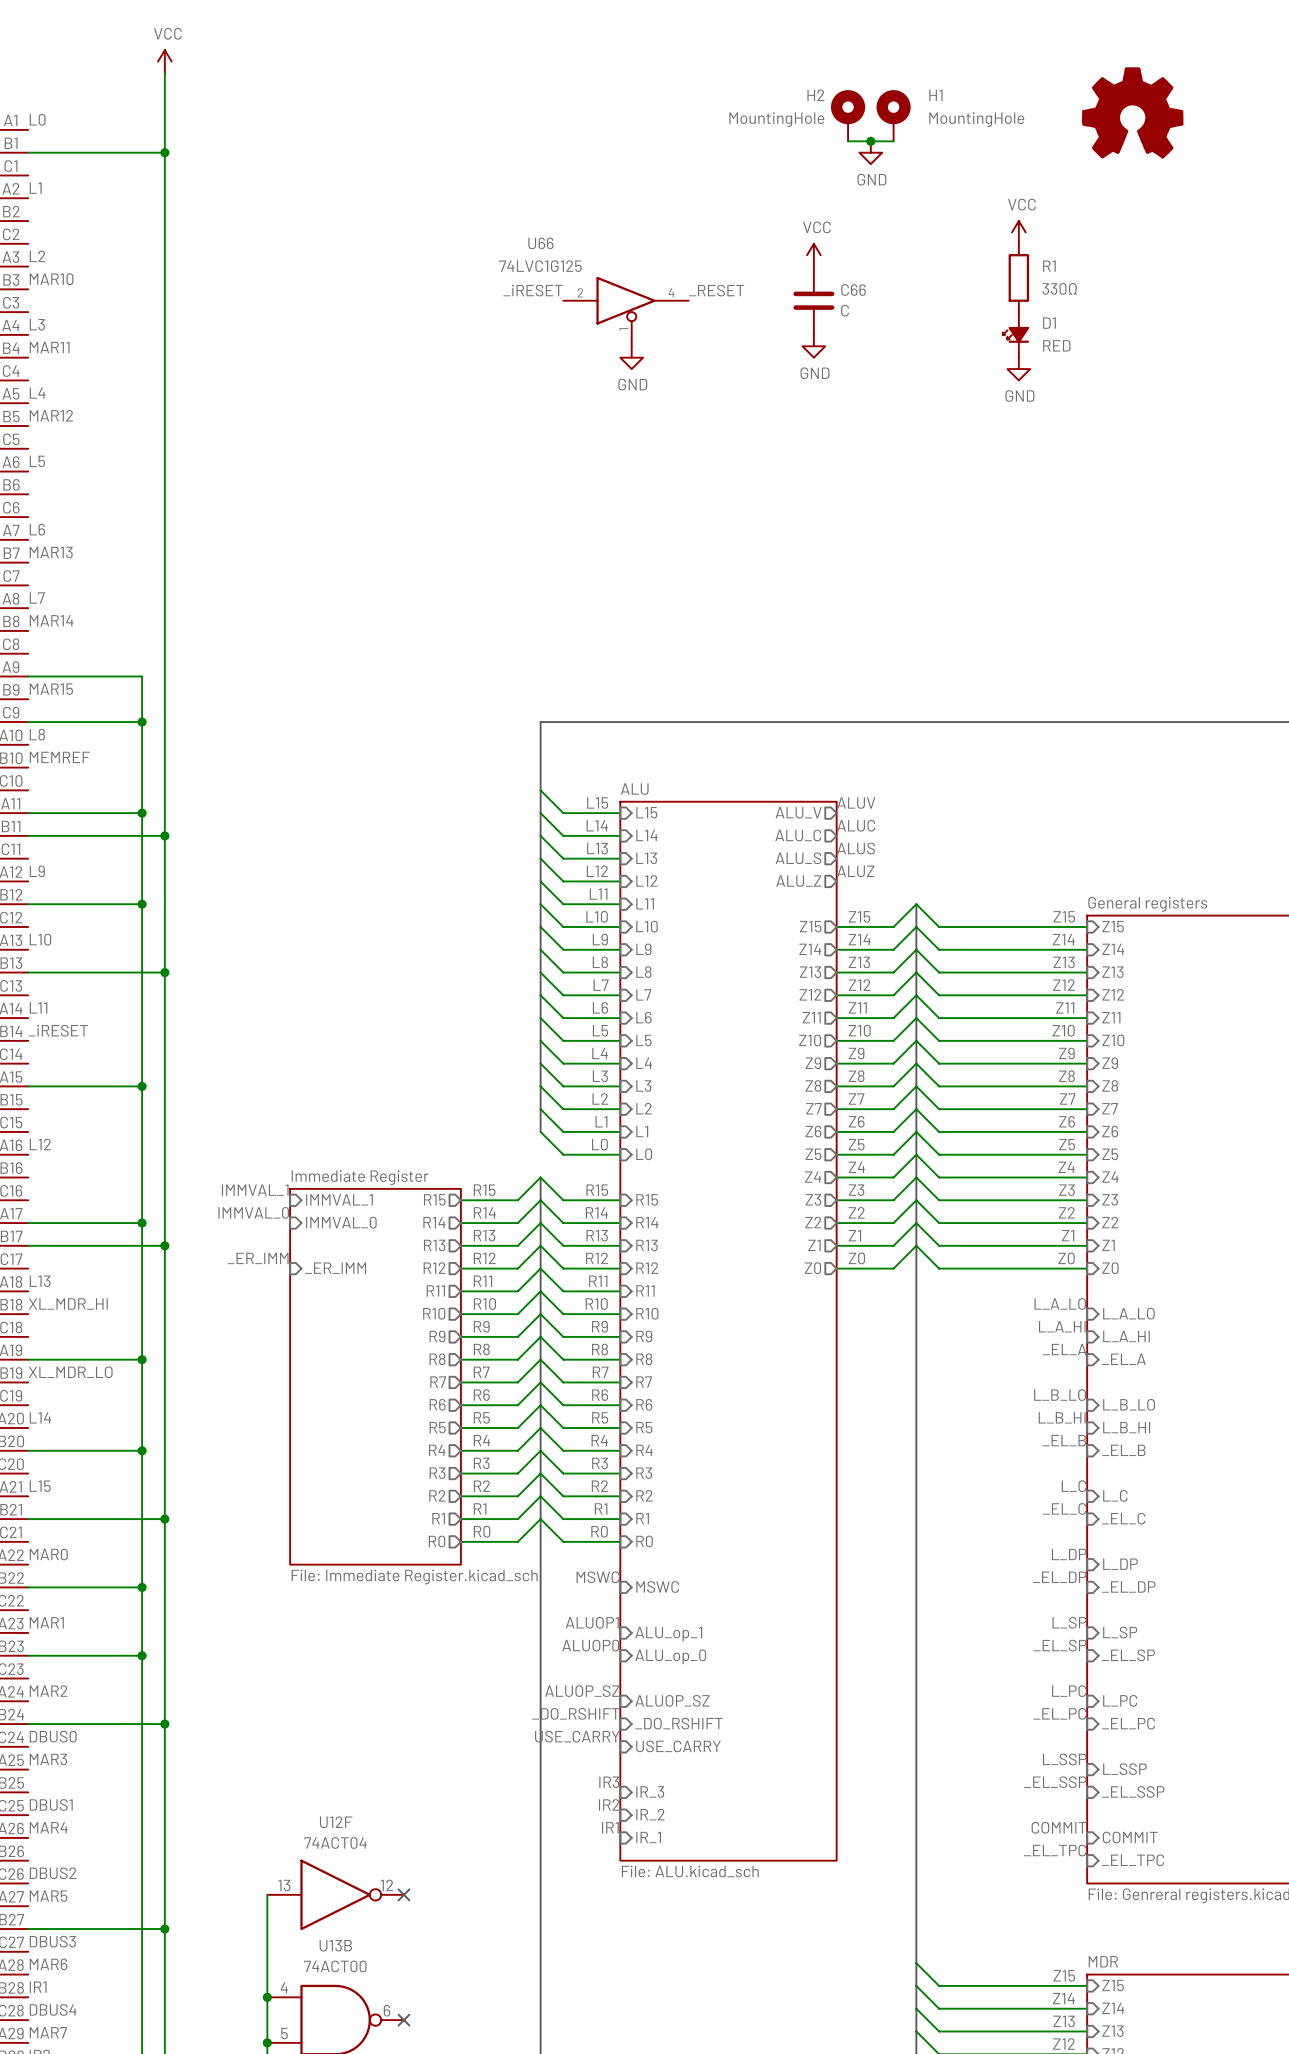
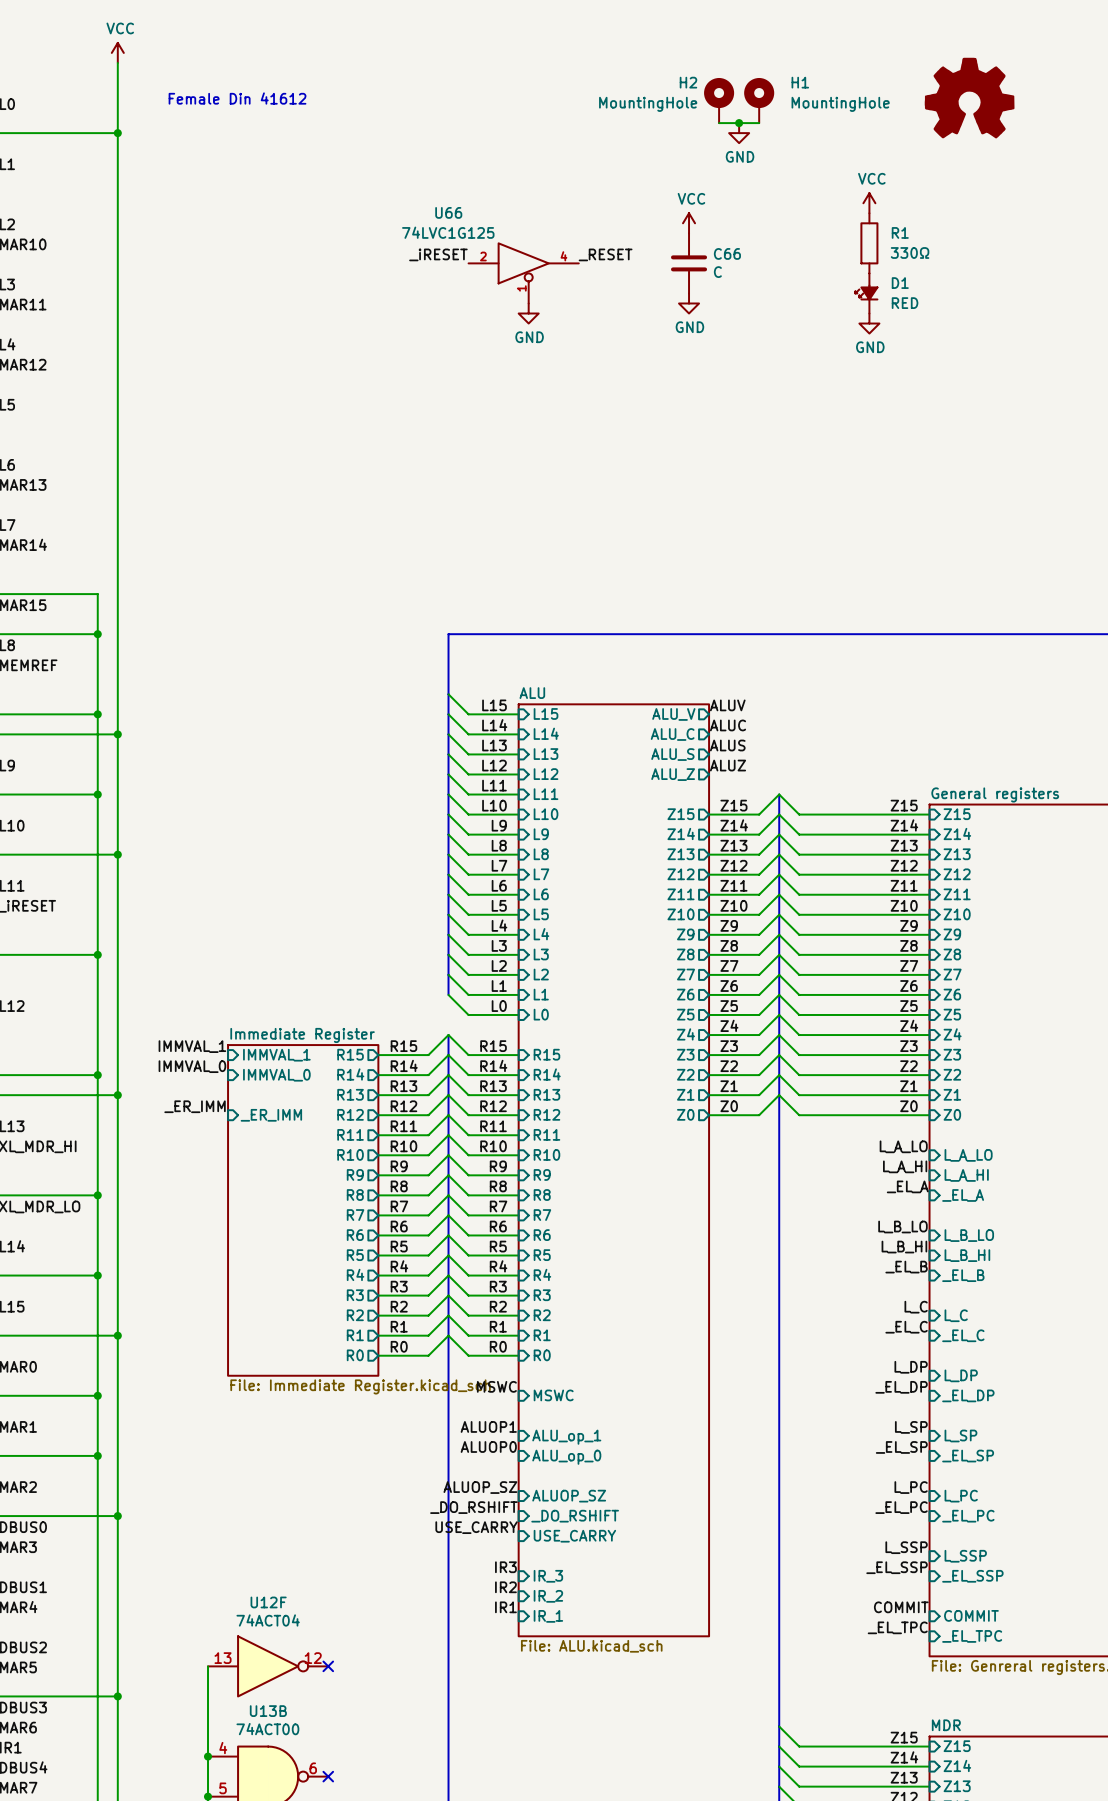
text: none -> Female Din 41612 (237, 98)

